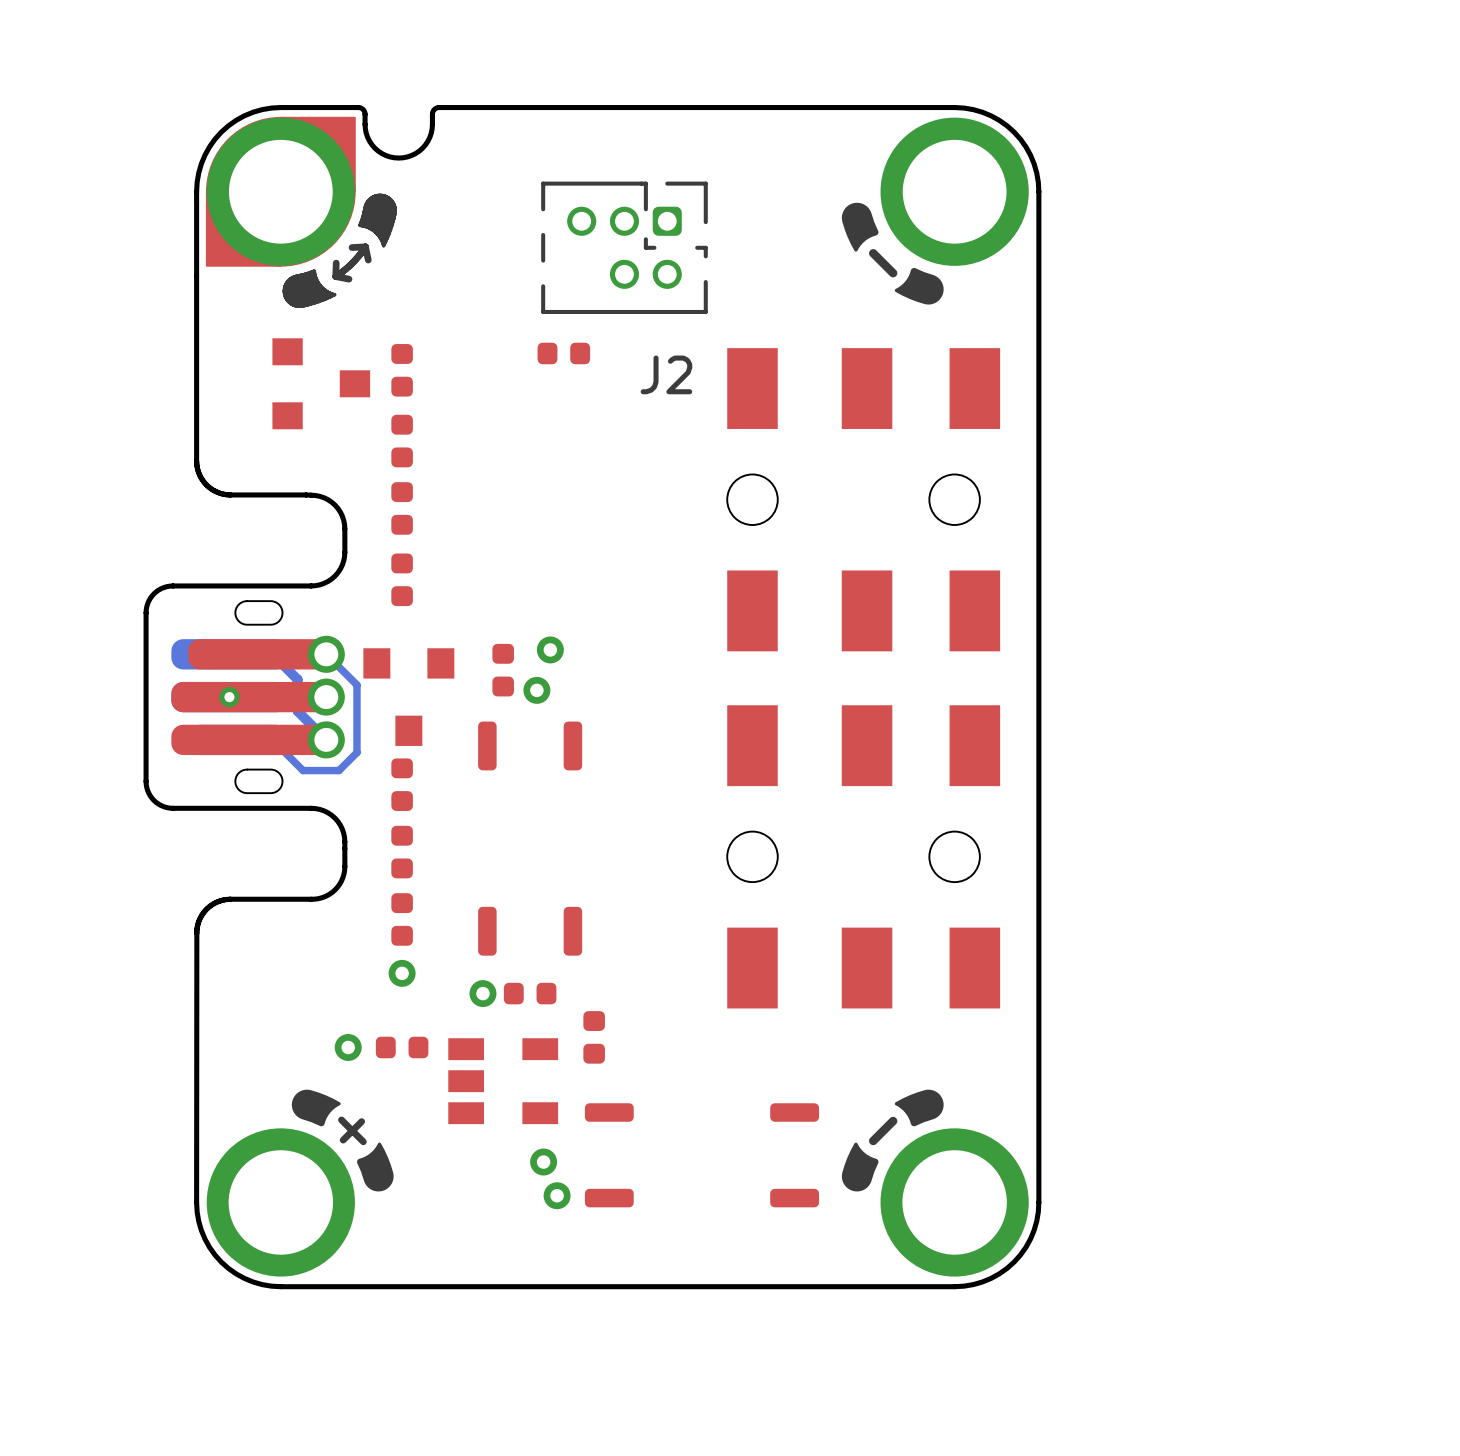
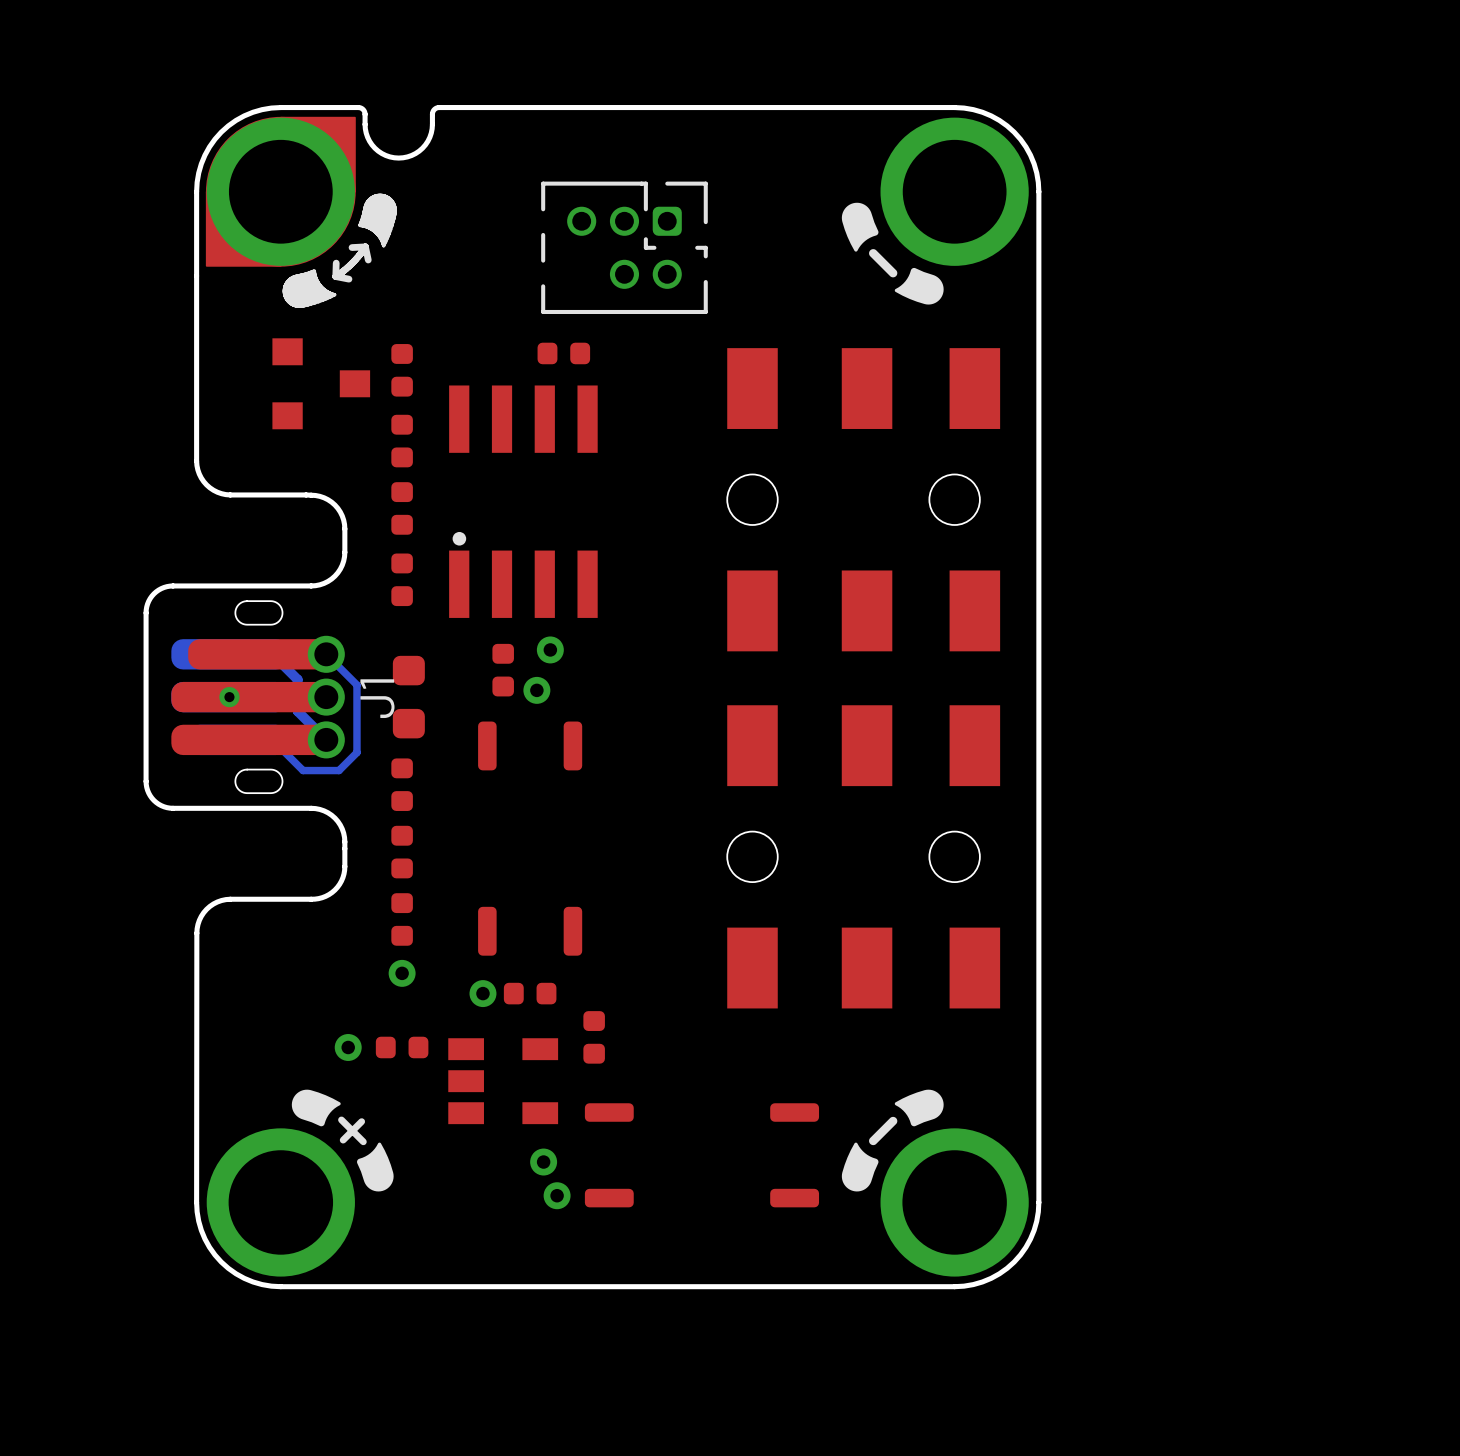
J2 name: J2 (666, 374) -> none
part: none -> (523, 501)
part footprint: [363, 648, 455, 746] -> [392, 655, 425, 739]
part: (252, 697) -> none
J1: none -> (252, 697)

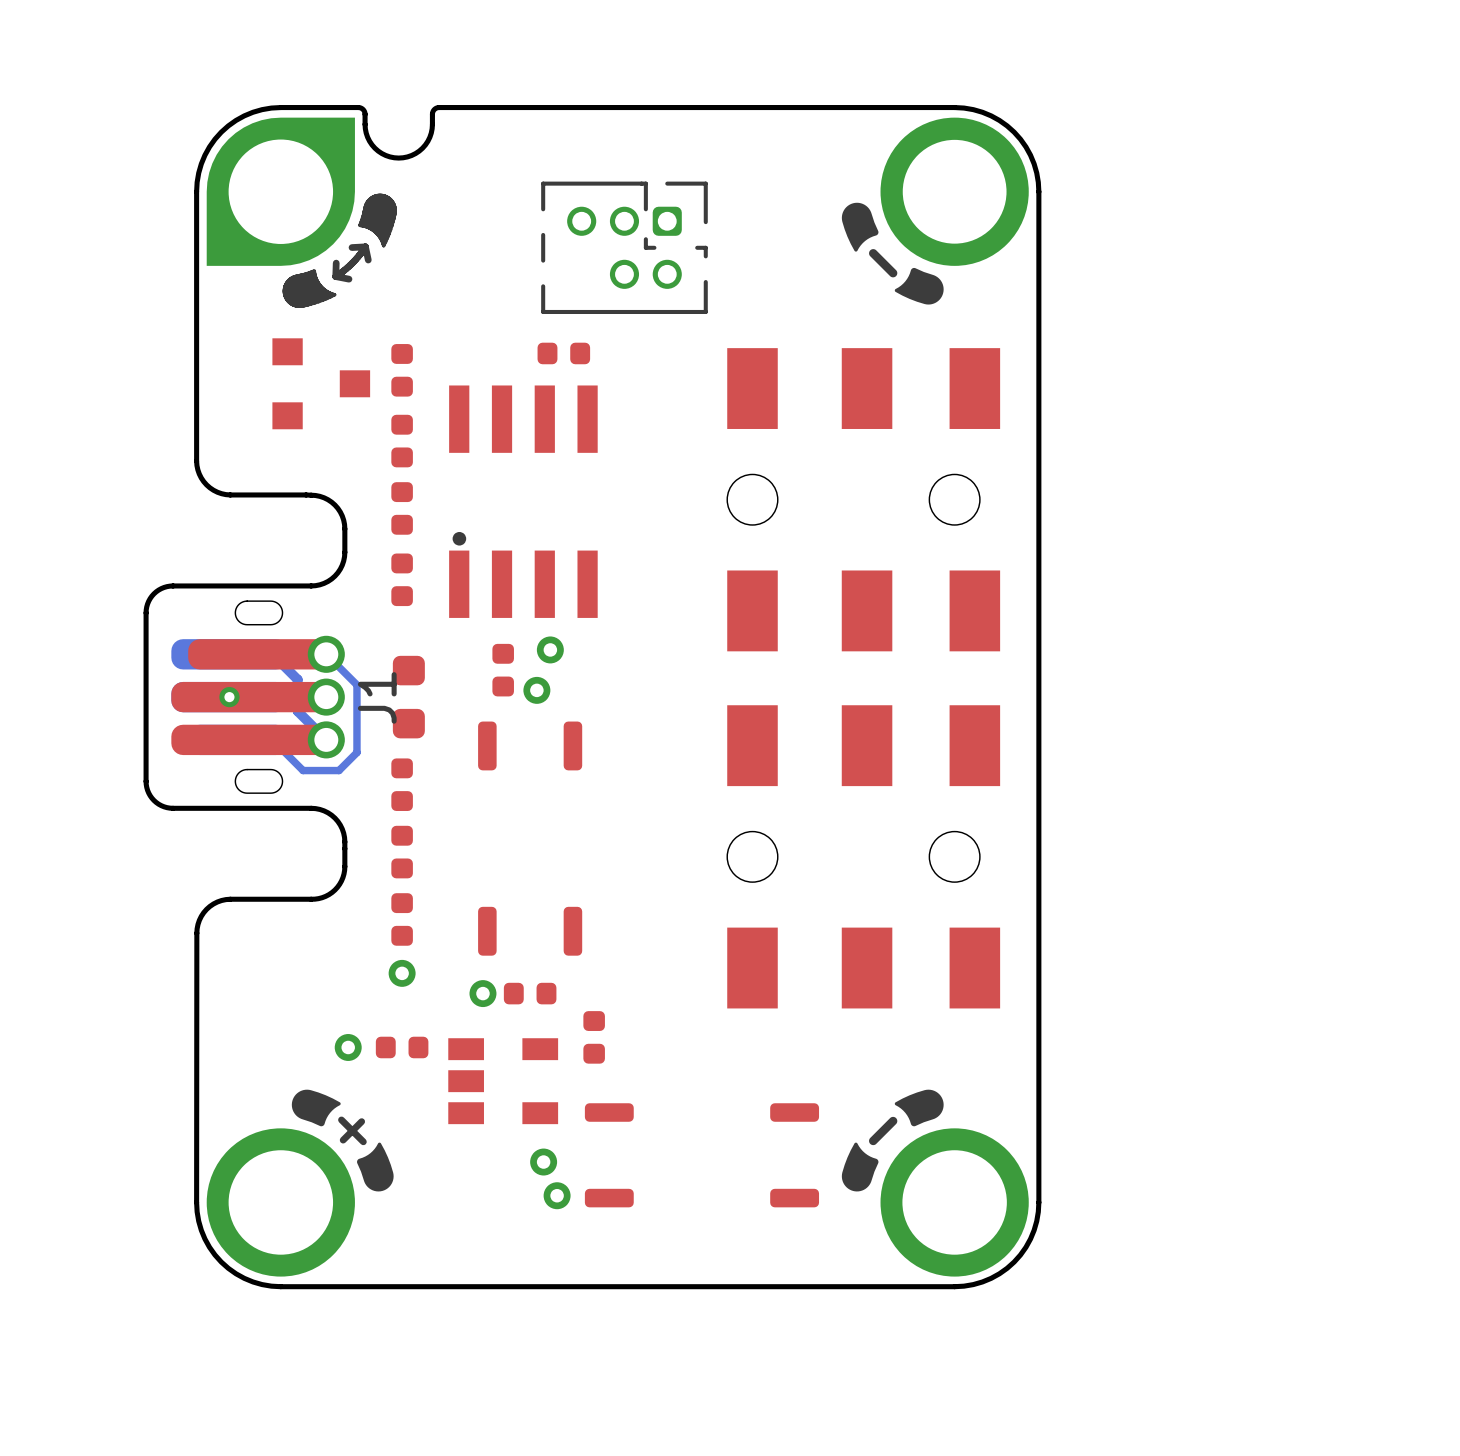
part footprint: [194, 105, 442, 308] -> [206, 105, 442, 308]

